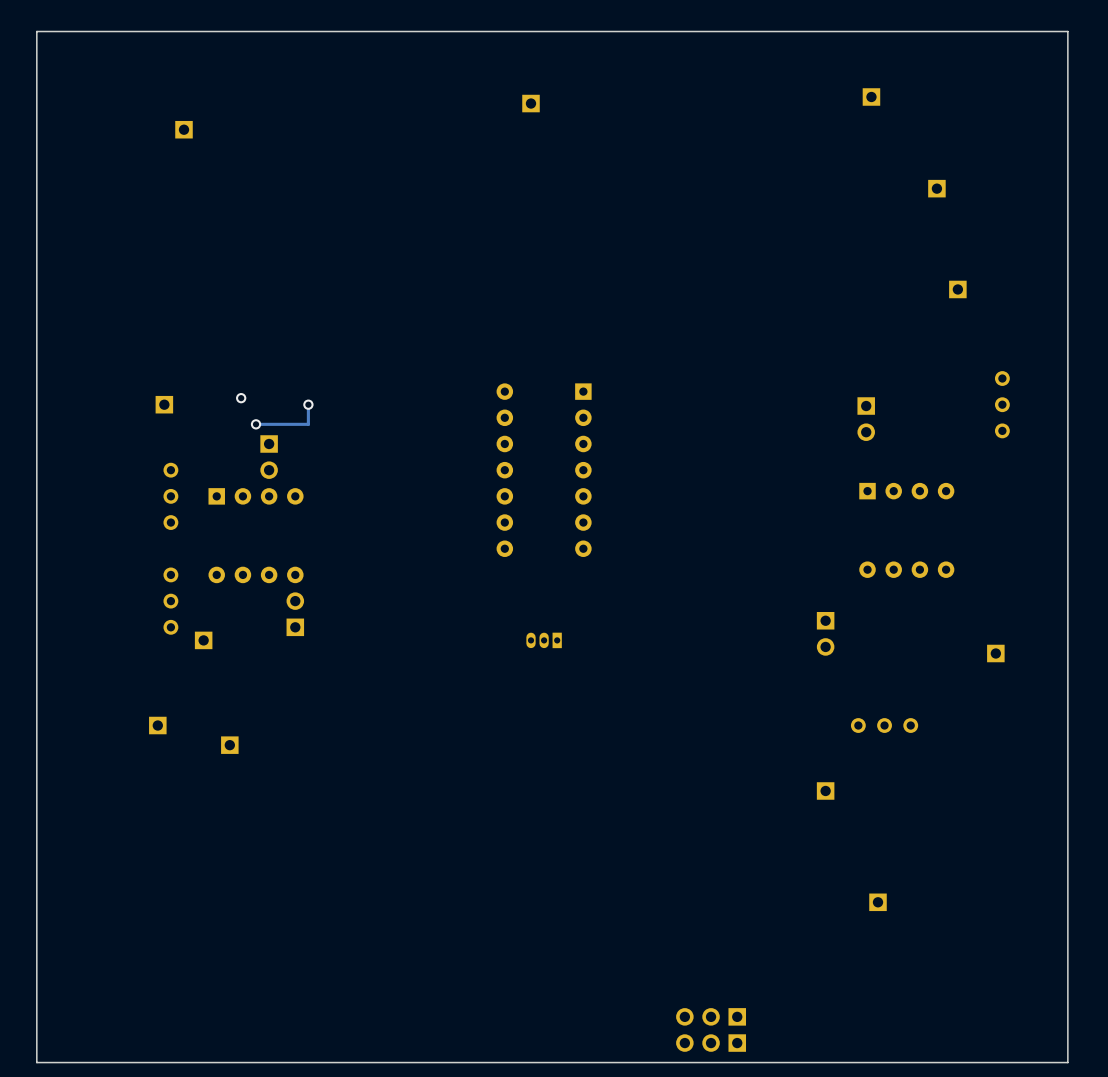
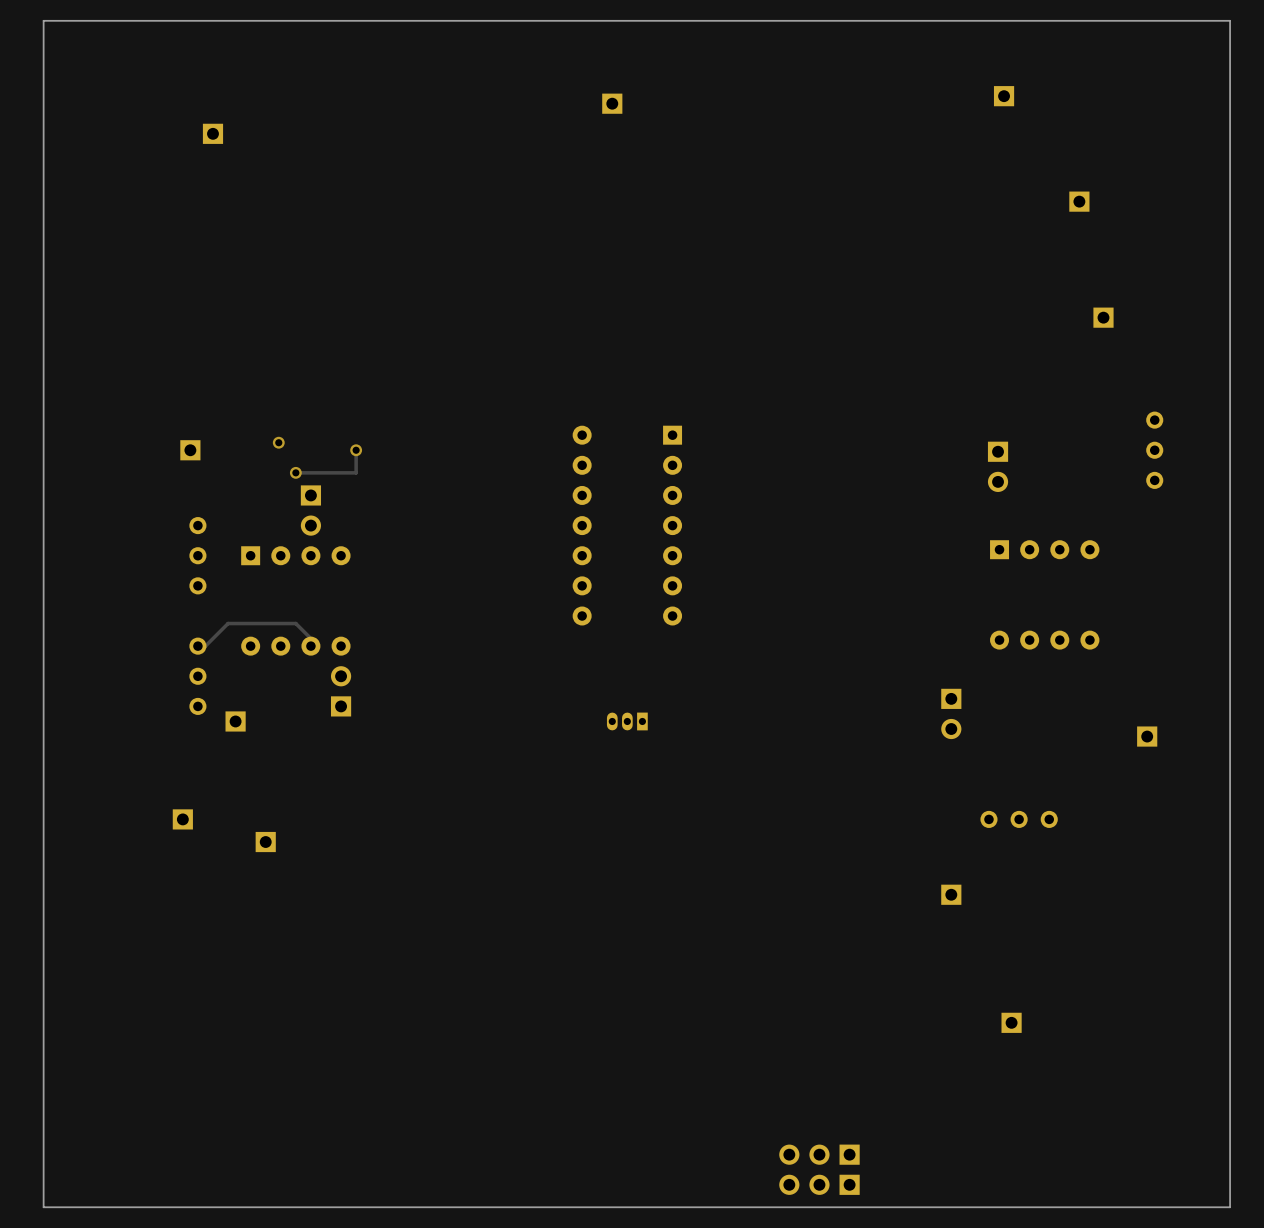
track: none -> (310, 646) (310, 638) (295, 623) (228, 623) (205, 646) (197, 646)

